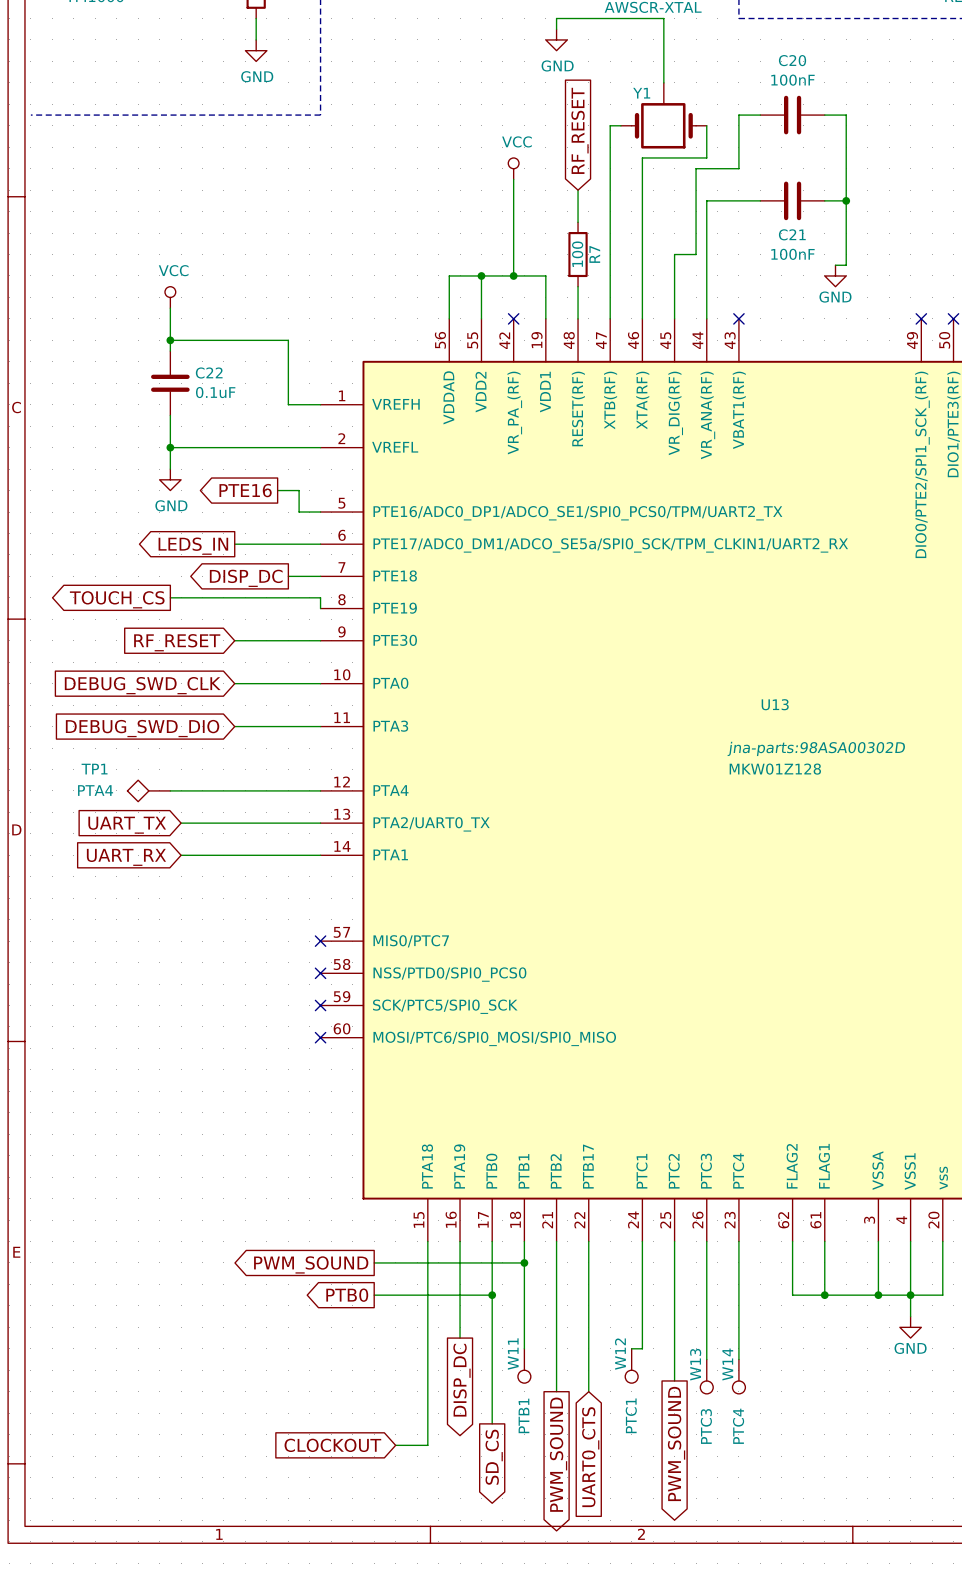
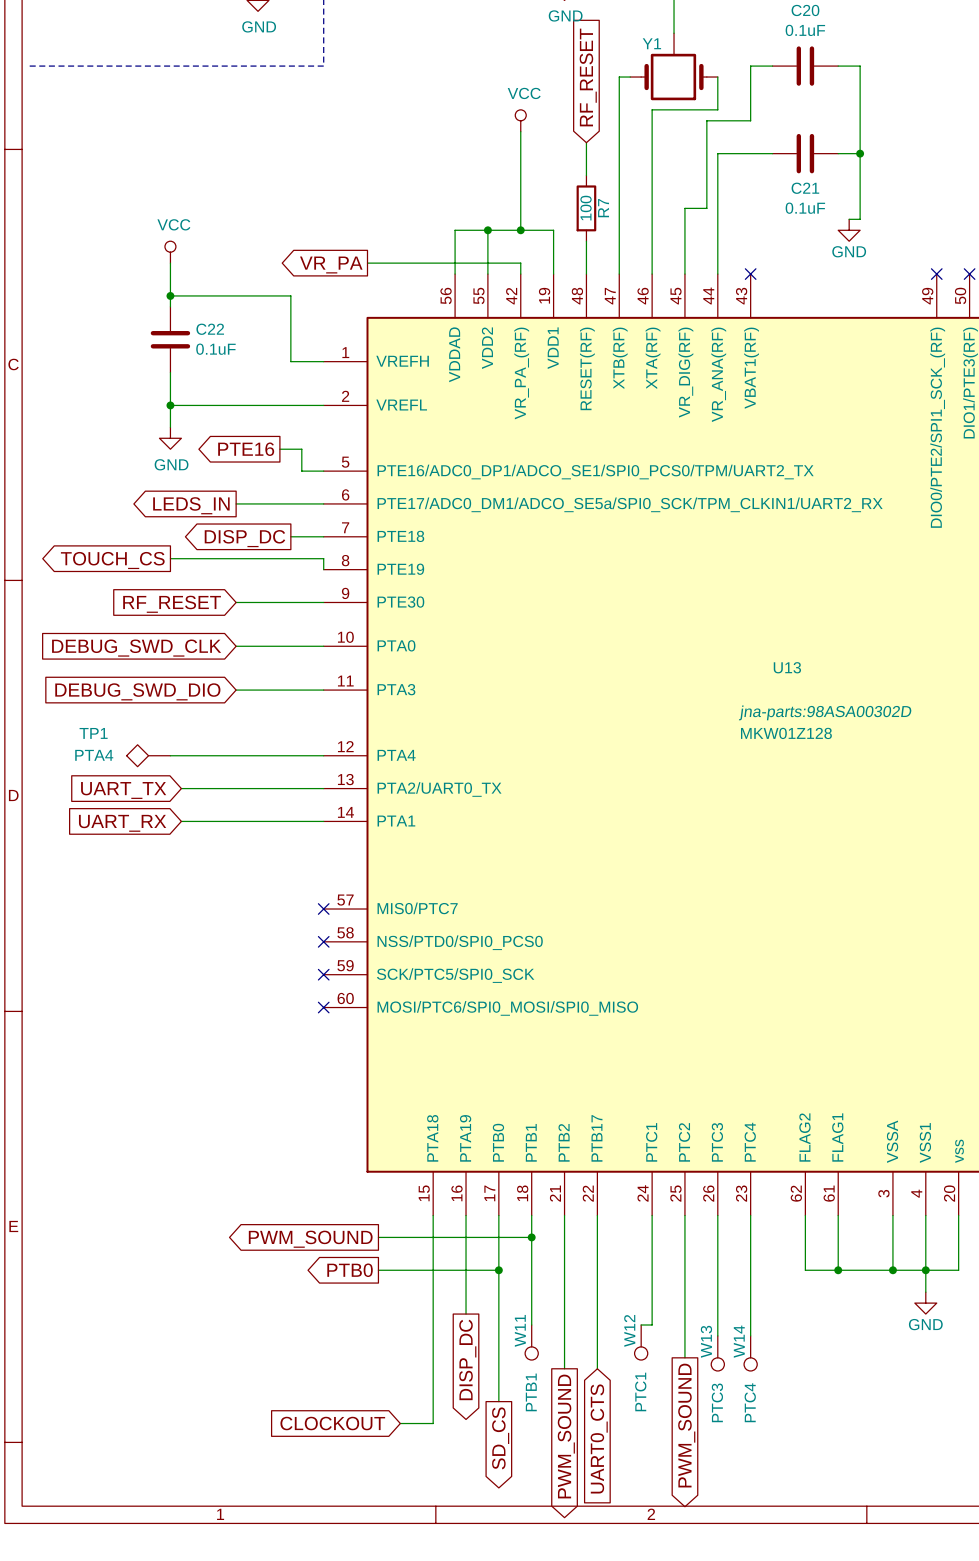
C20 value: 100nF (792, 80) -> 0.1uF (805, 30)
C21 value: 100nF (792, 254) -> 0.1uF (805, 208)
wire: none -> (367, 263) (520, 263) (520, 274)
global label: none -> VR_PA (331, 265)
no-connect mark: (513, 318) -> none

